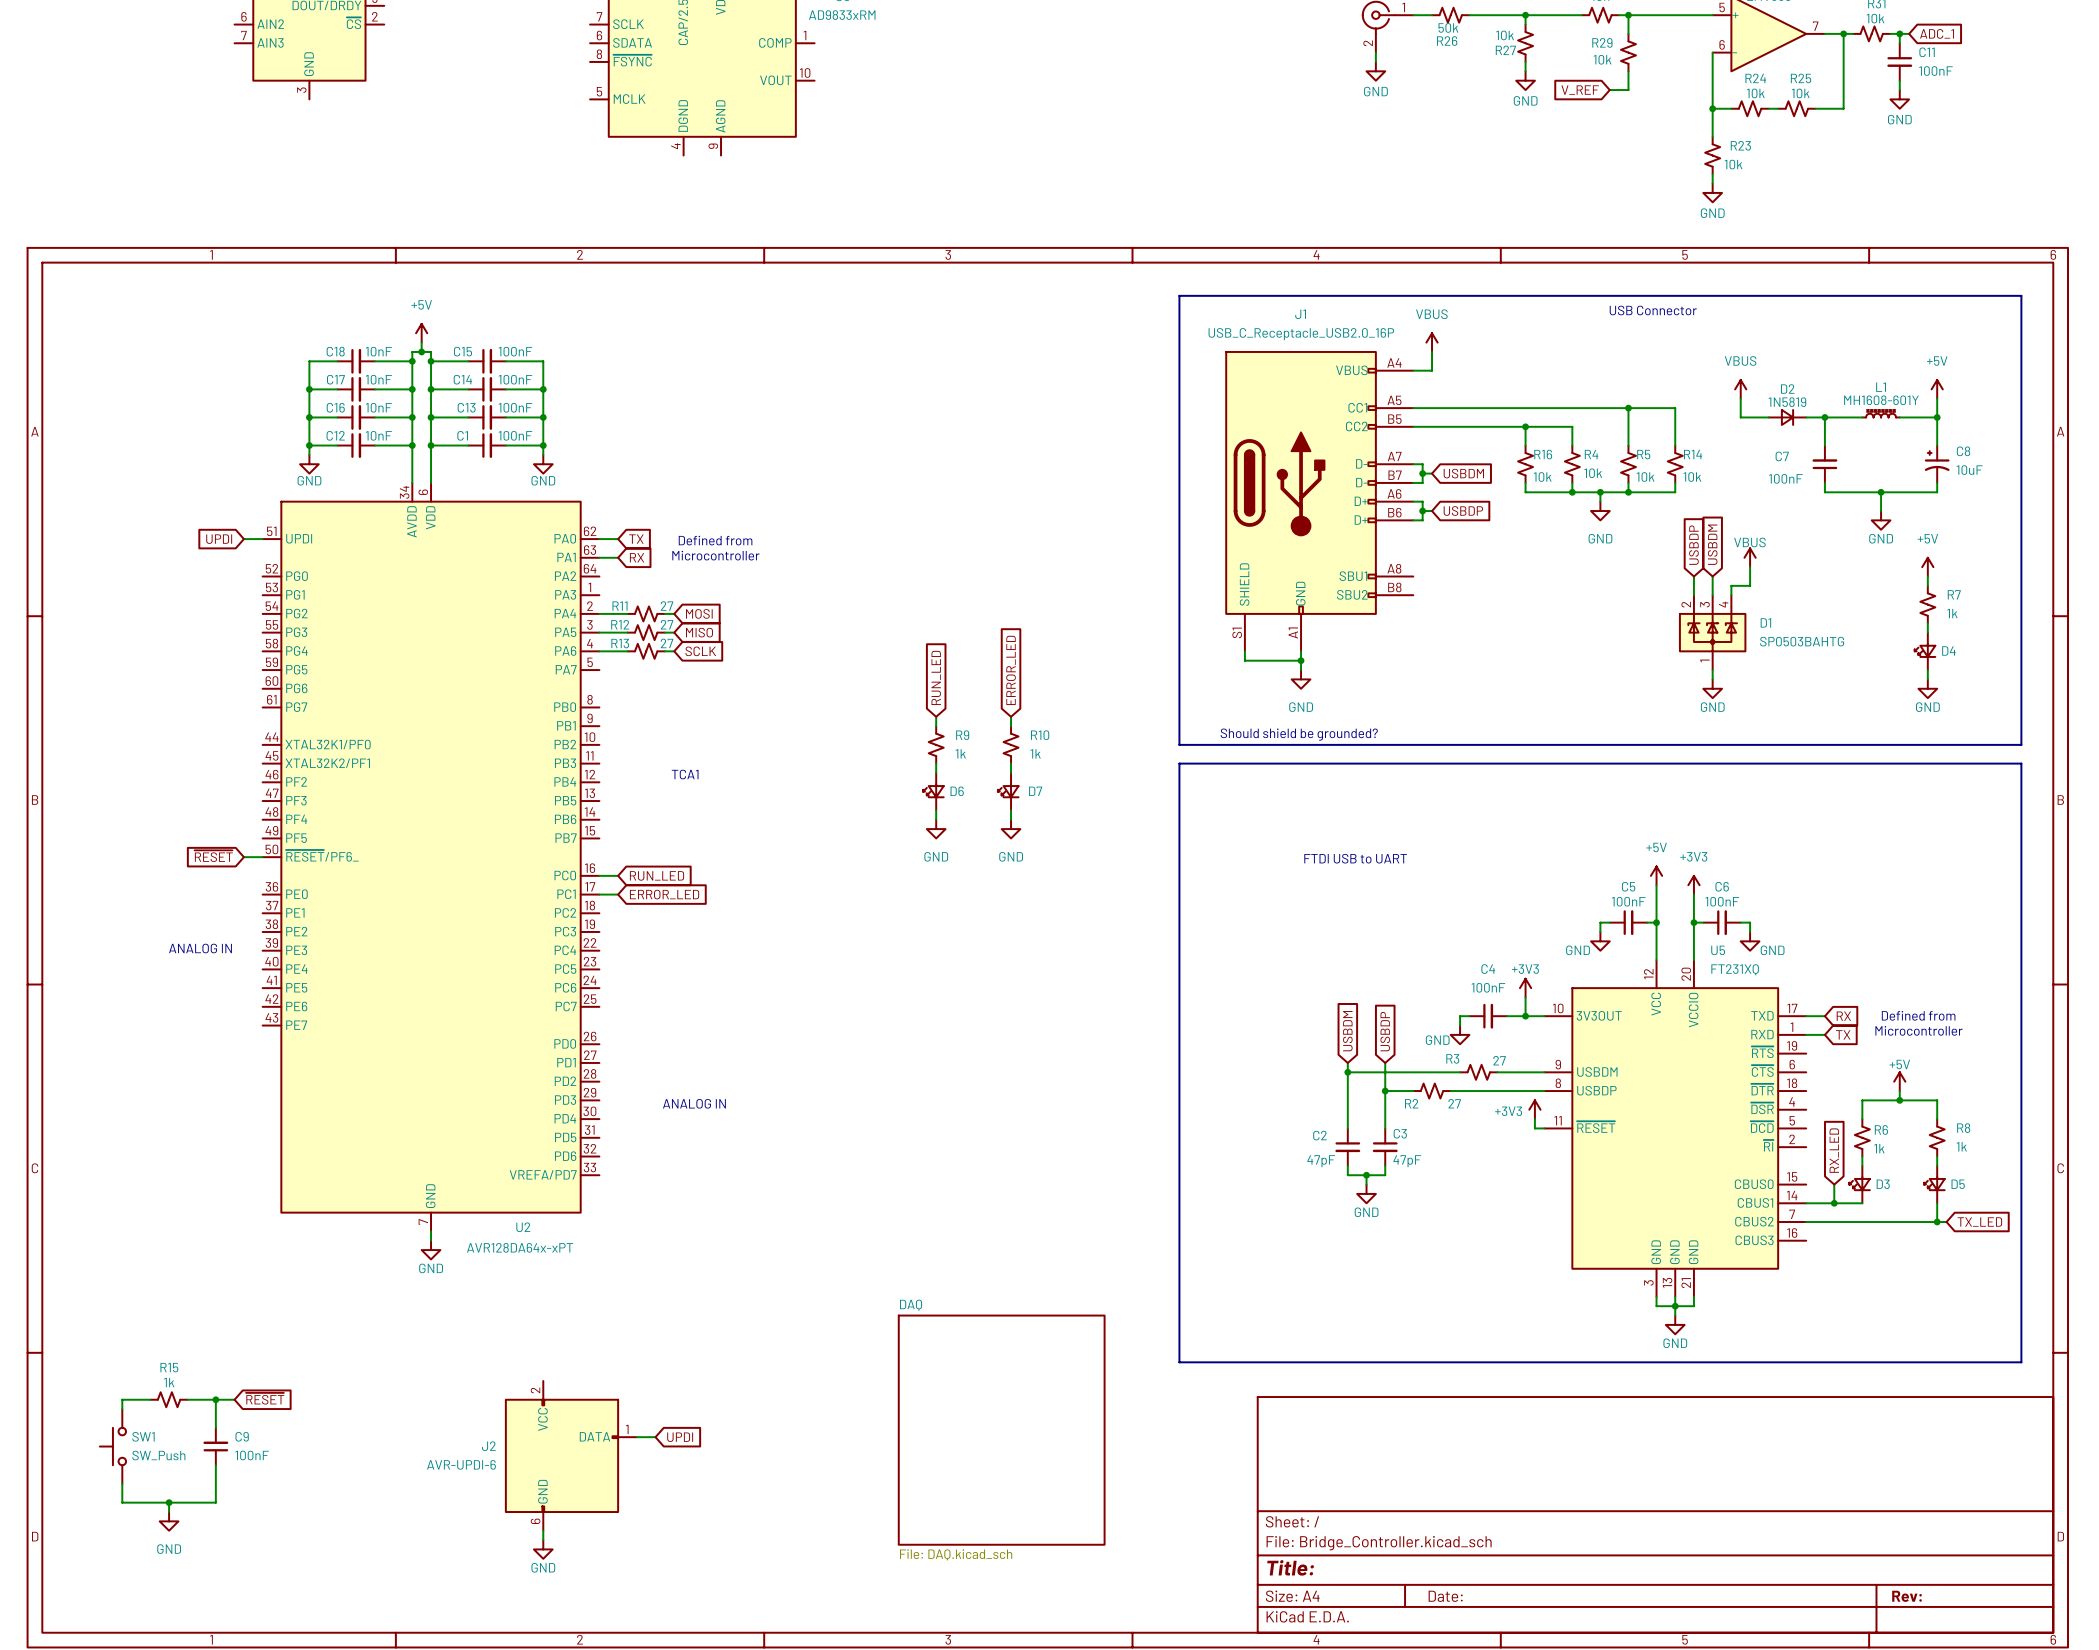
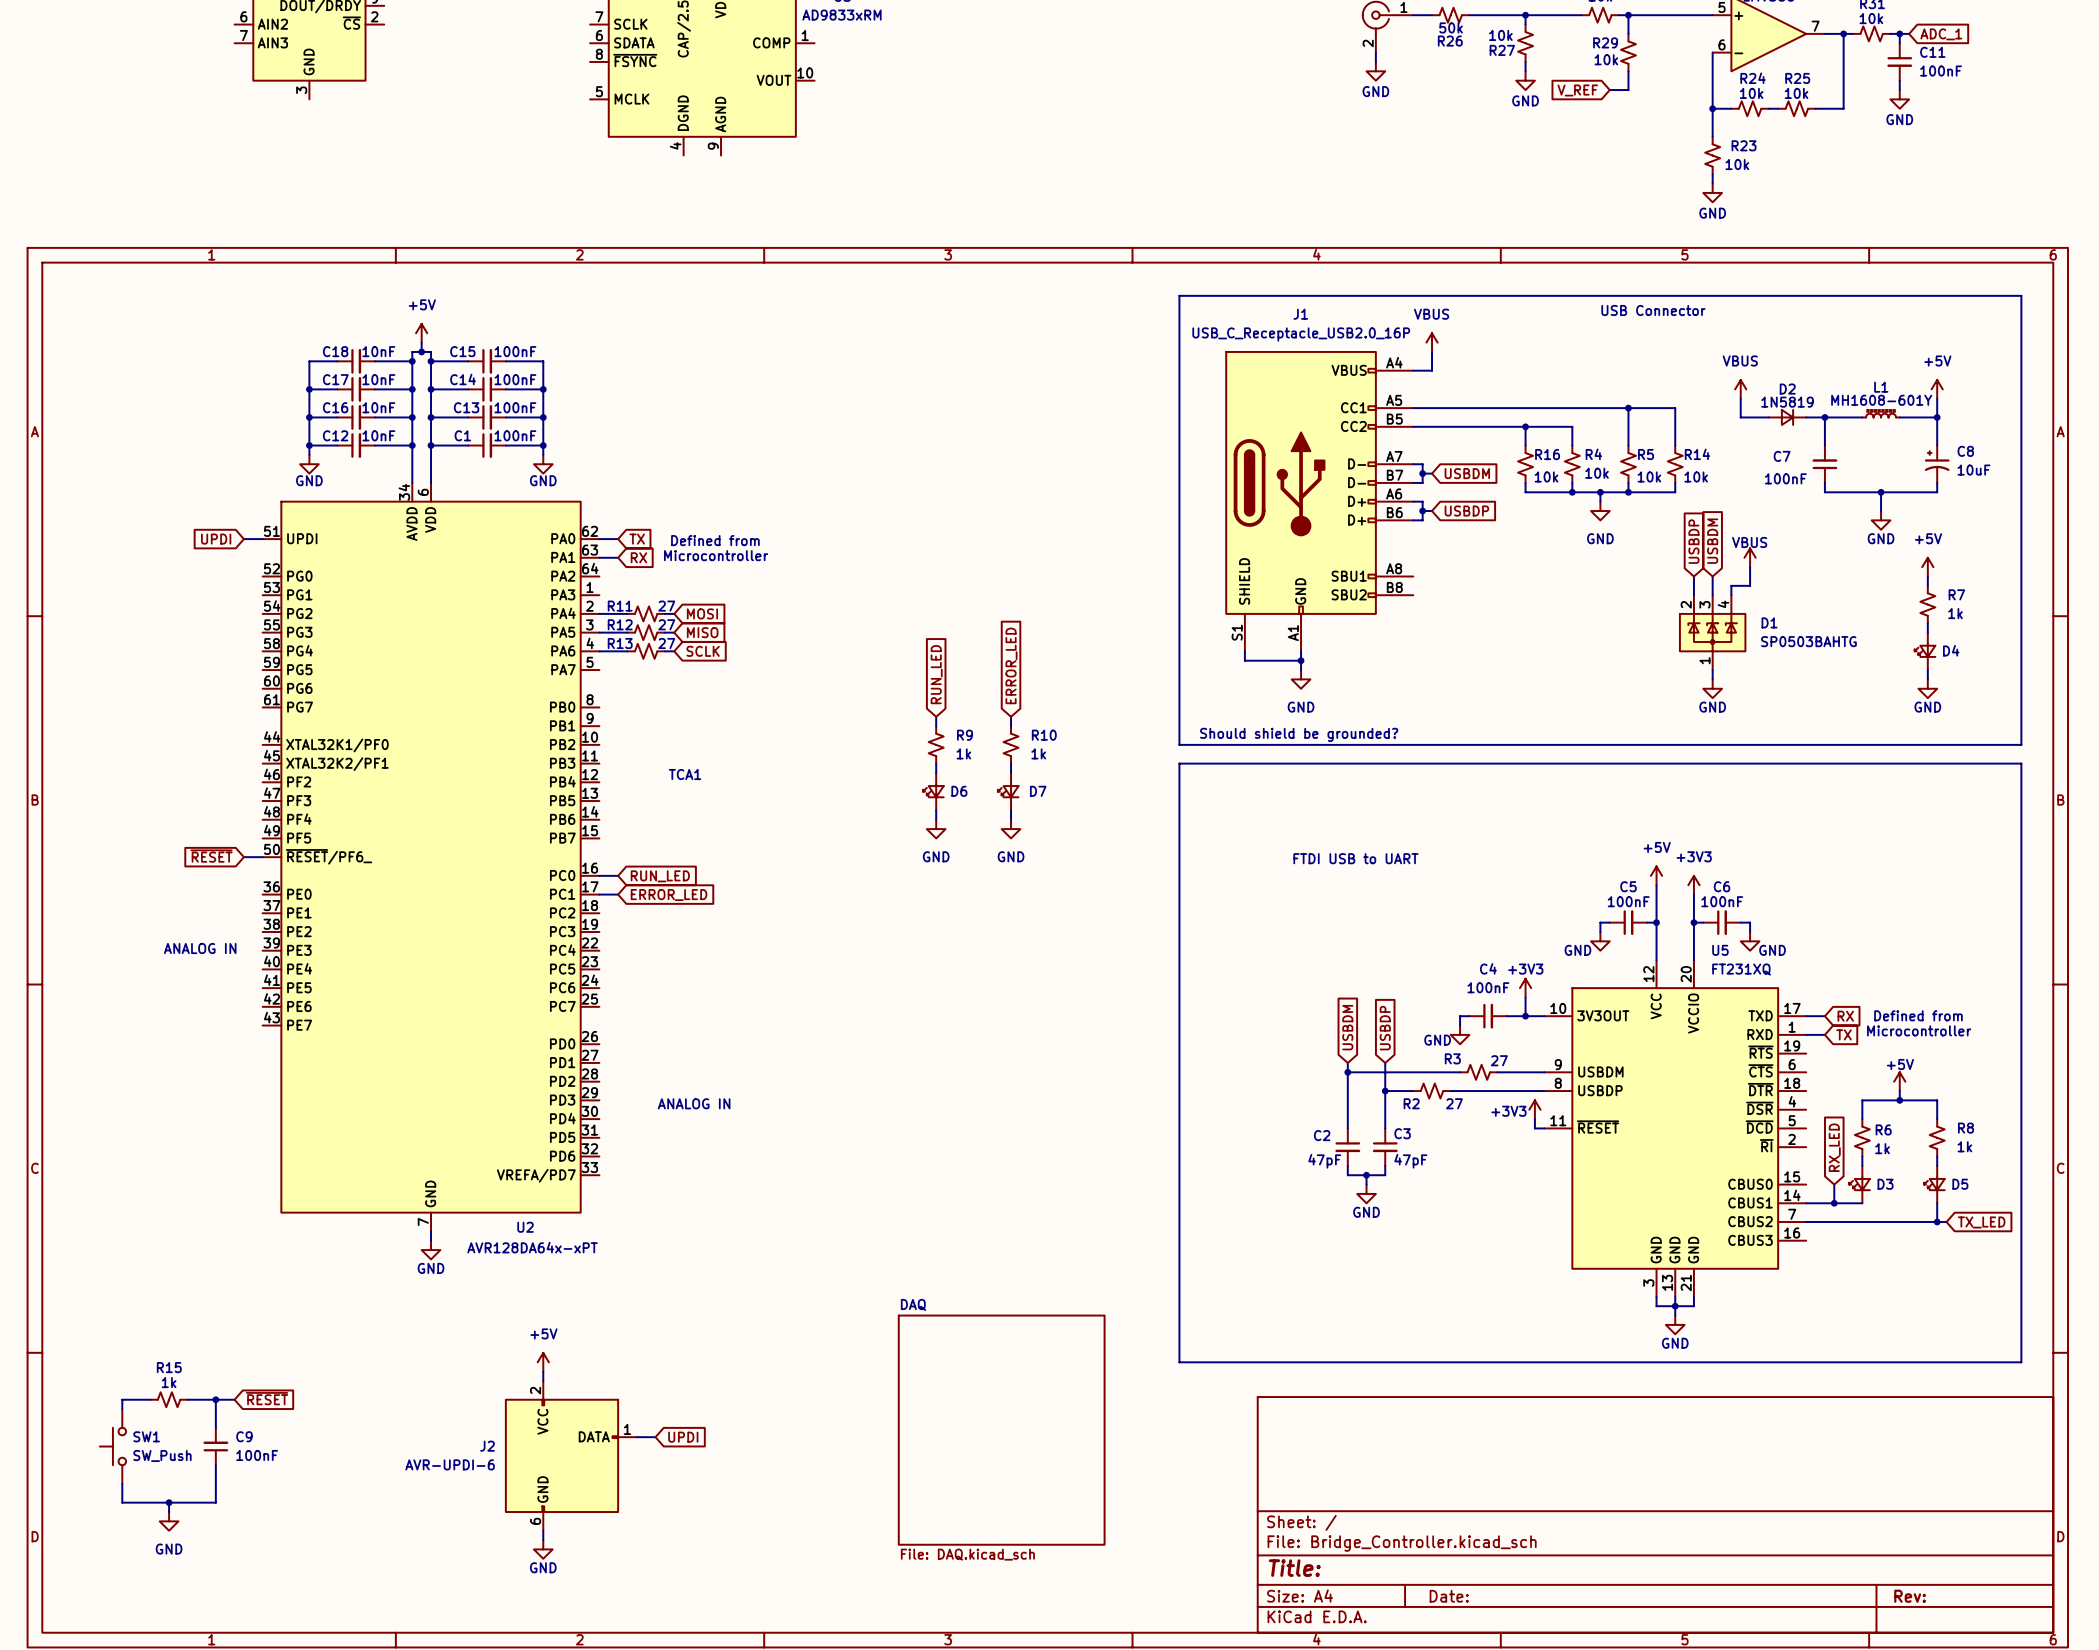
power symbol: none -> +5V (543, 1362)
wire: none -> (543, 1371) (543, 1381)

